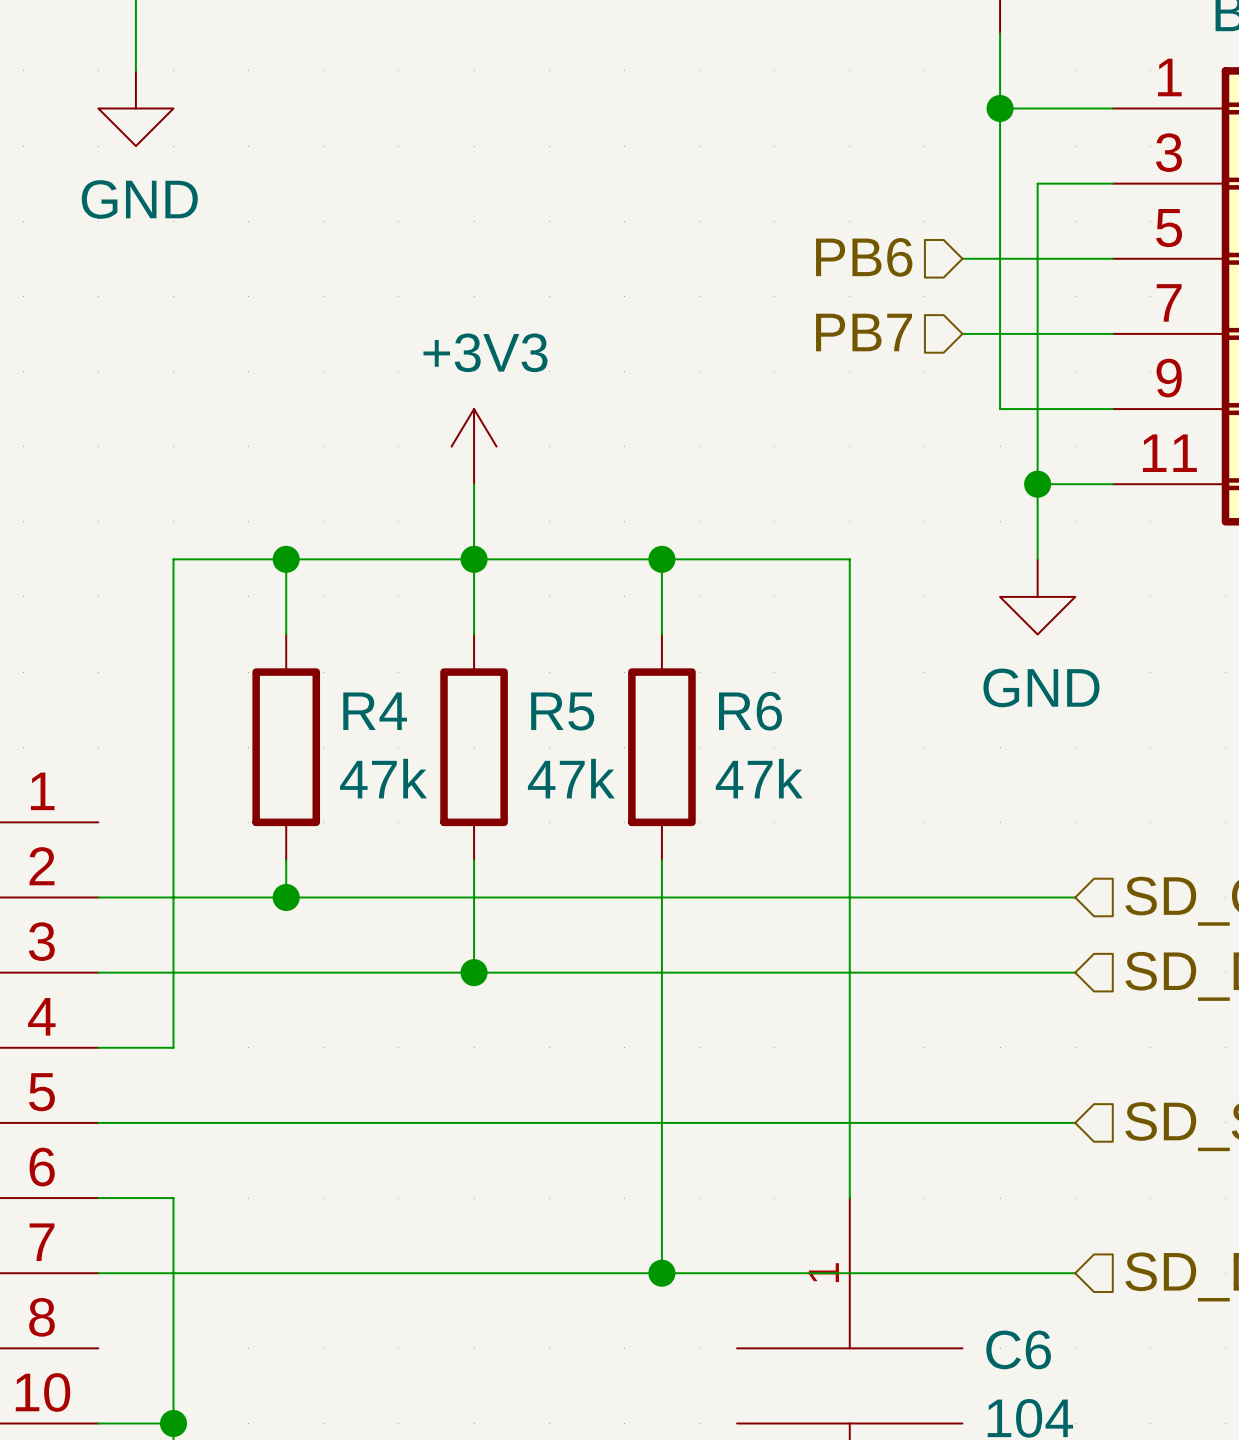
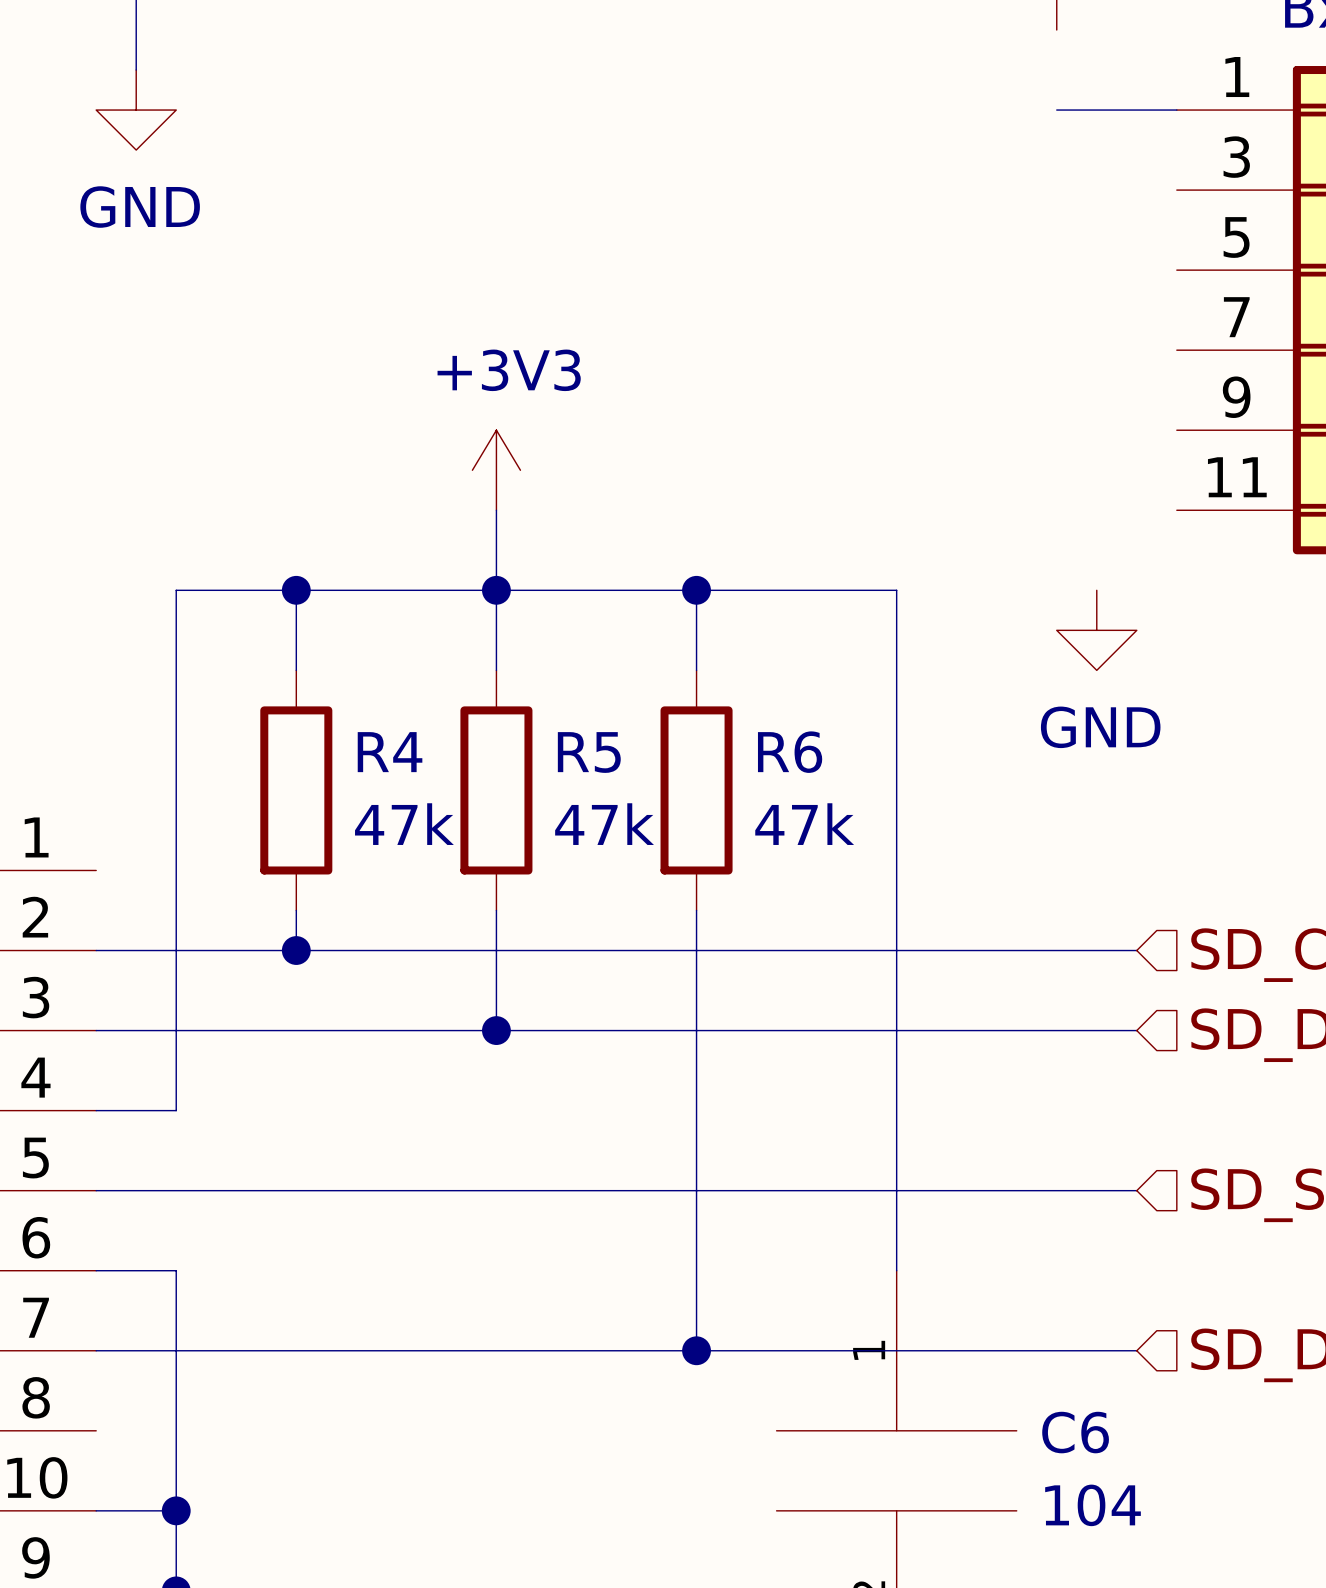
wire: (1000, 33) (1000, 409) (1112, 409) -> none
junction: (1000, 108) -> none
wire: (1112, 183) (1037, 183) (1037, 559) -> none
hierarchical label: PB6 (864, 257) -> none
wire: (962, 258) (1112, 258) -> none
hierarchical label: PB7 (864, 332) -> none
wire: (962, 333) (1112, 333) -> none
wire: (1037, 484) (1112, 484) -> none
junction: (1037, 484) -> none

